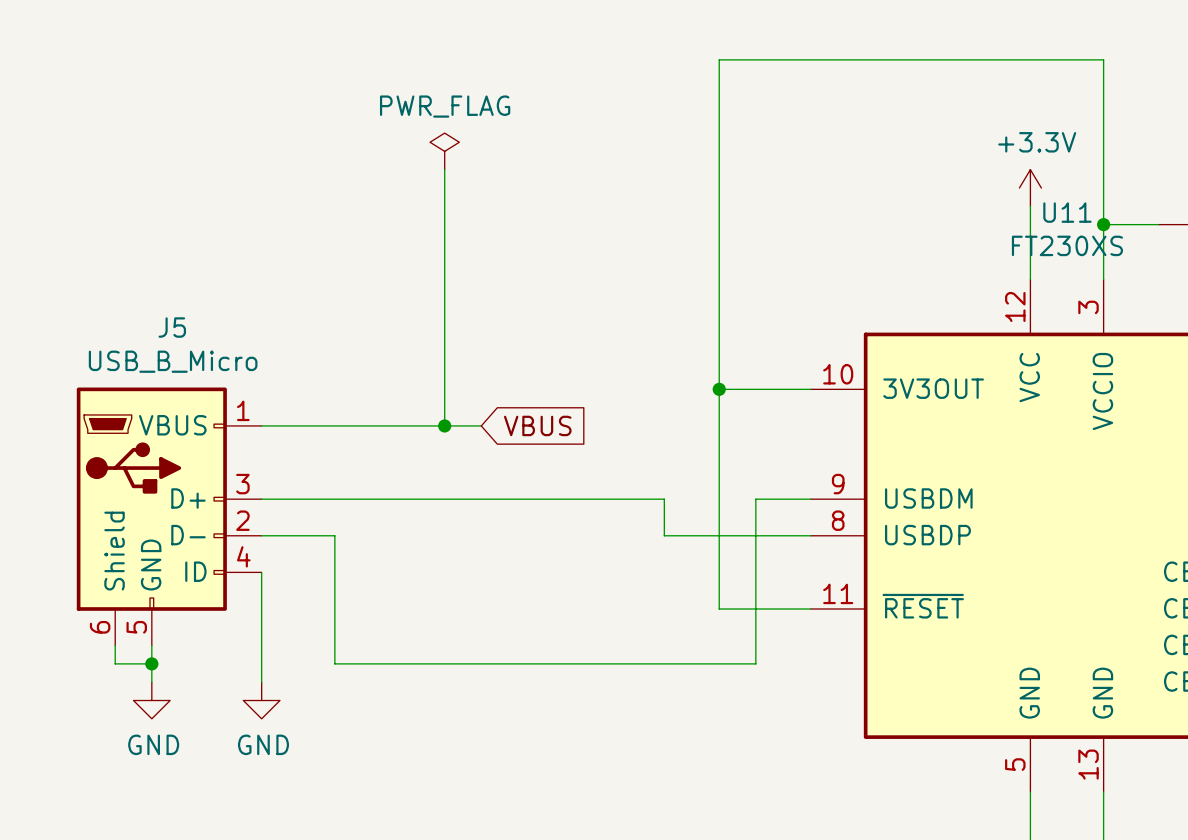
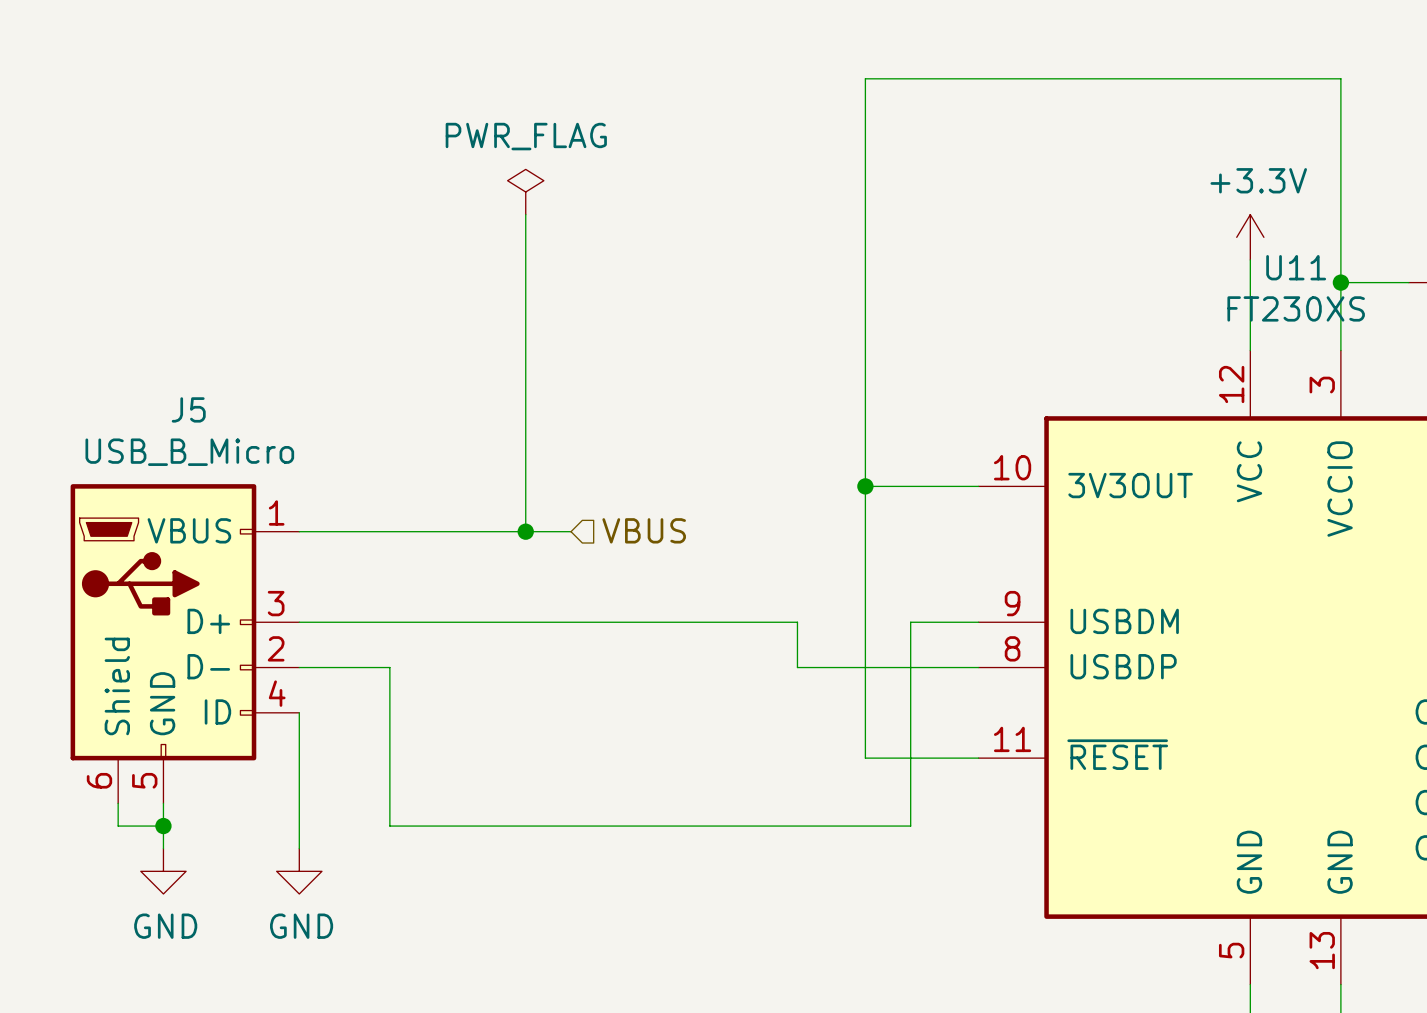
global label: VBUS (537, 425) -> none
hierarchical label: none -> VBUS (644, 530)

